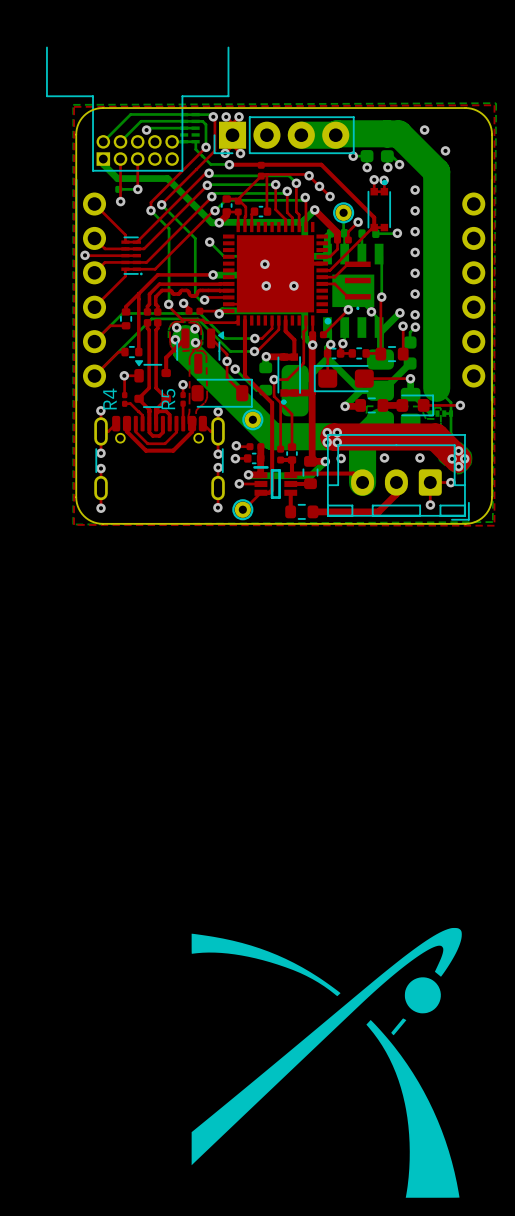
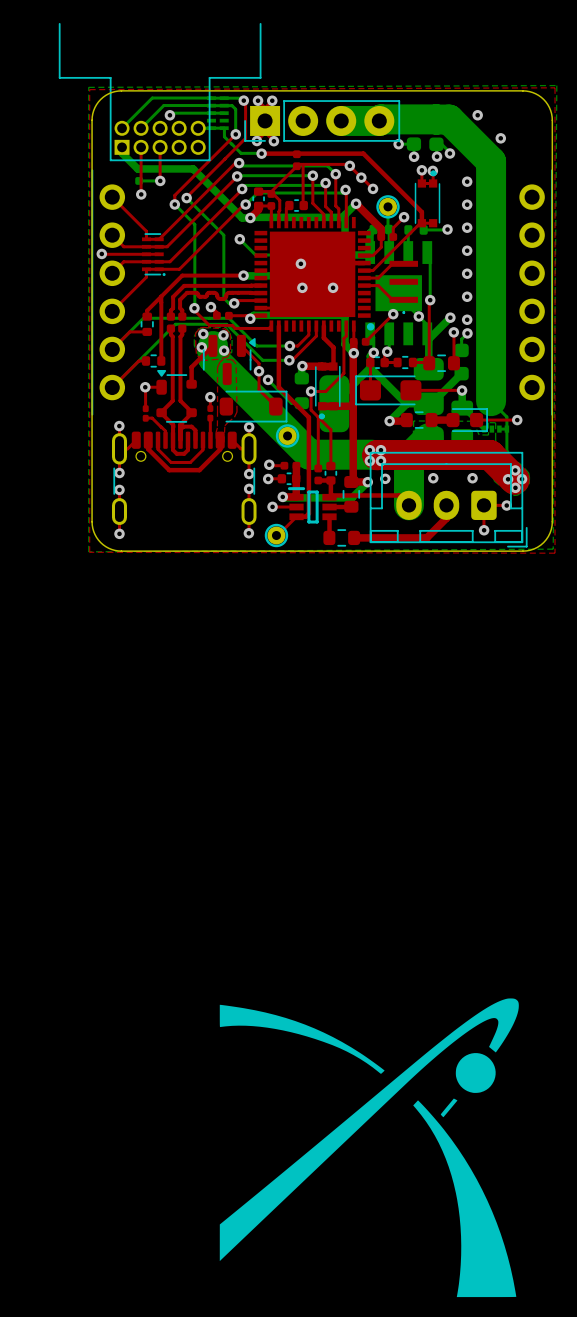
R4 name: R4 (109, 398) -> none
R5 name: R5 (168, 399) -> none

